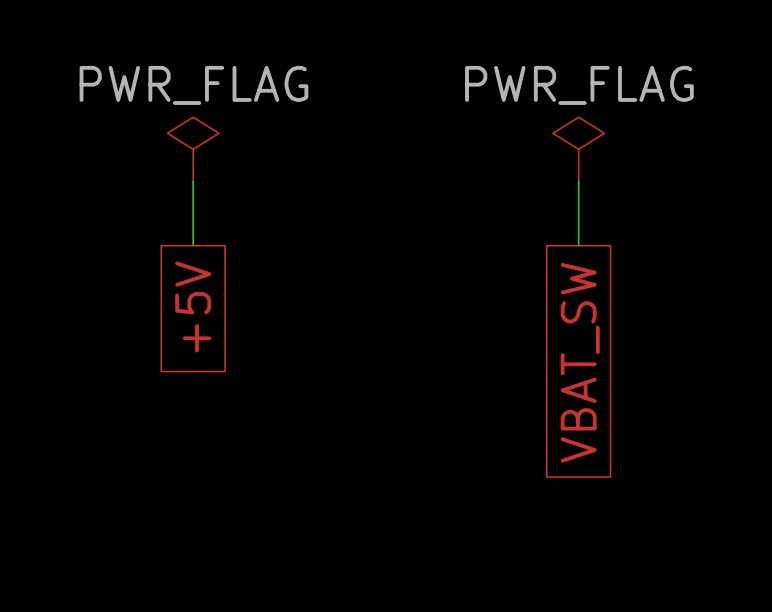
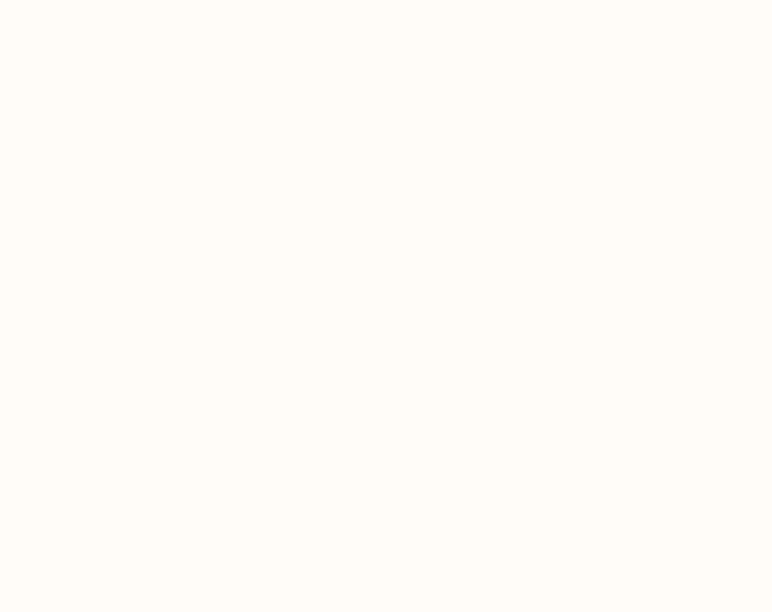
power symbol: PWR_FLAG (193, 149) -> none
power symbol: PWR_FLAG (578, 149) -> none
wire: (193, 181) (193, 245) -> none
wire: (578, 181) (578, 245) -> none
global label: +5V (193, 306) -> none
global label: VBAT_SW (580, 362) -> none

